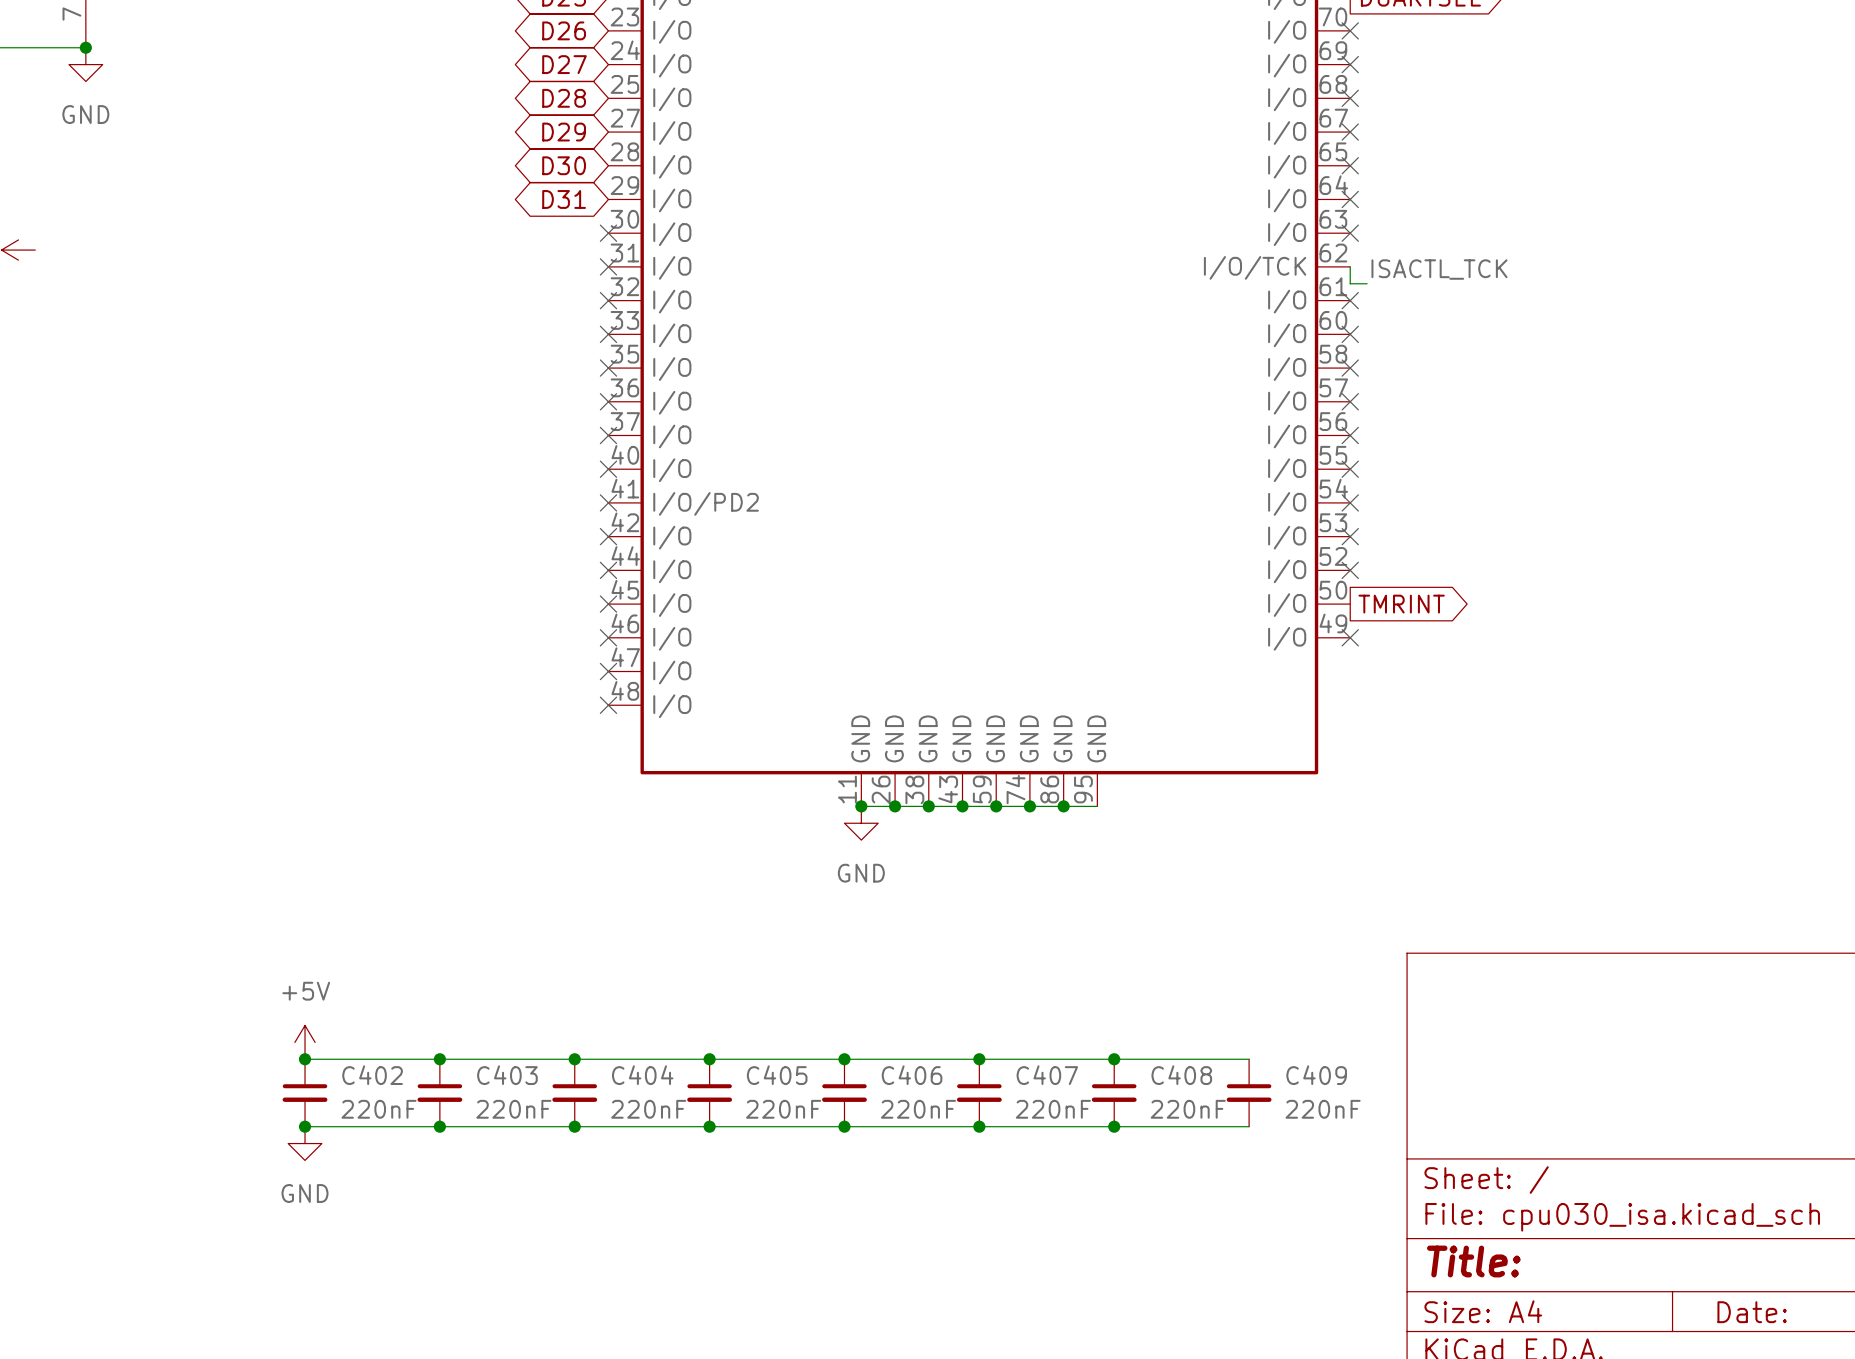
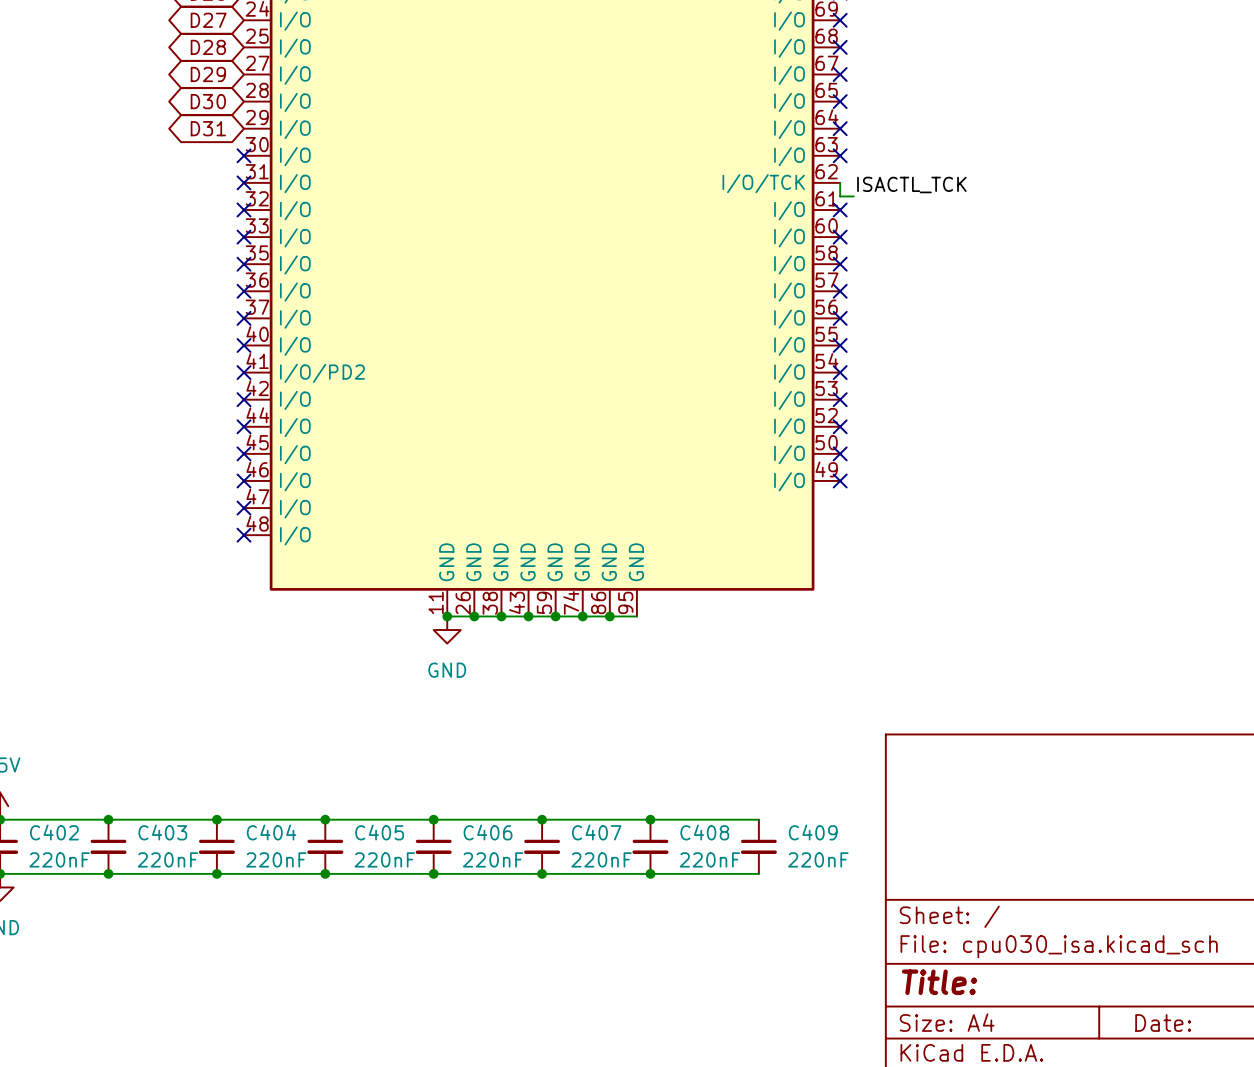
no-connect mark: none -> (840, 453)
global label: TMRINT (1401, 604) -> none

